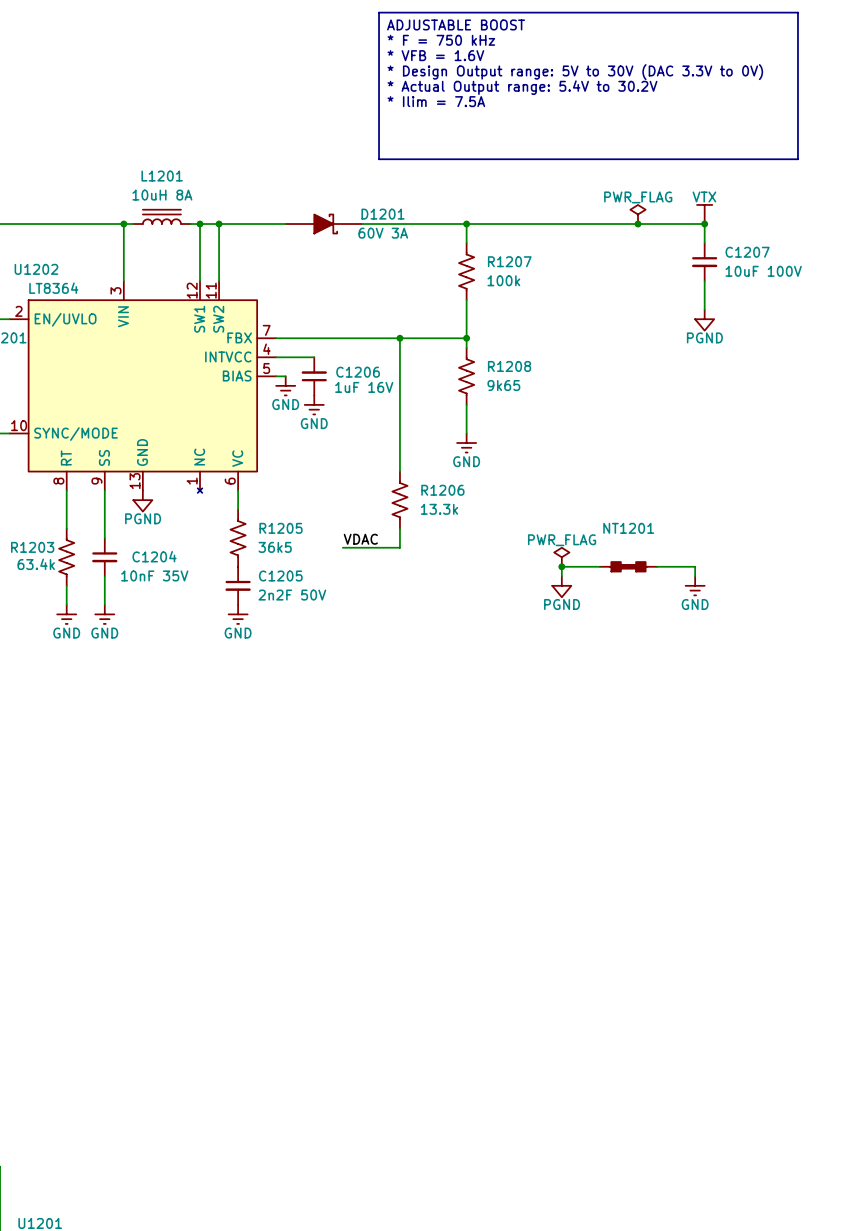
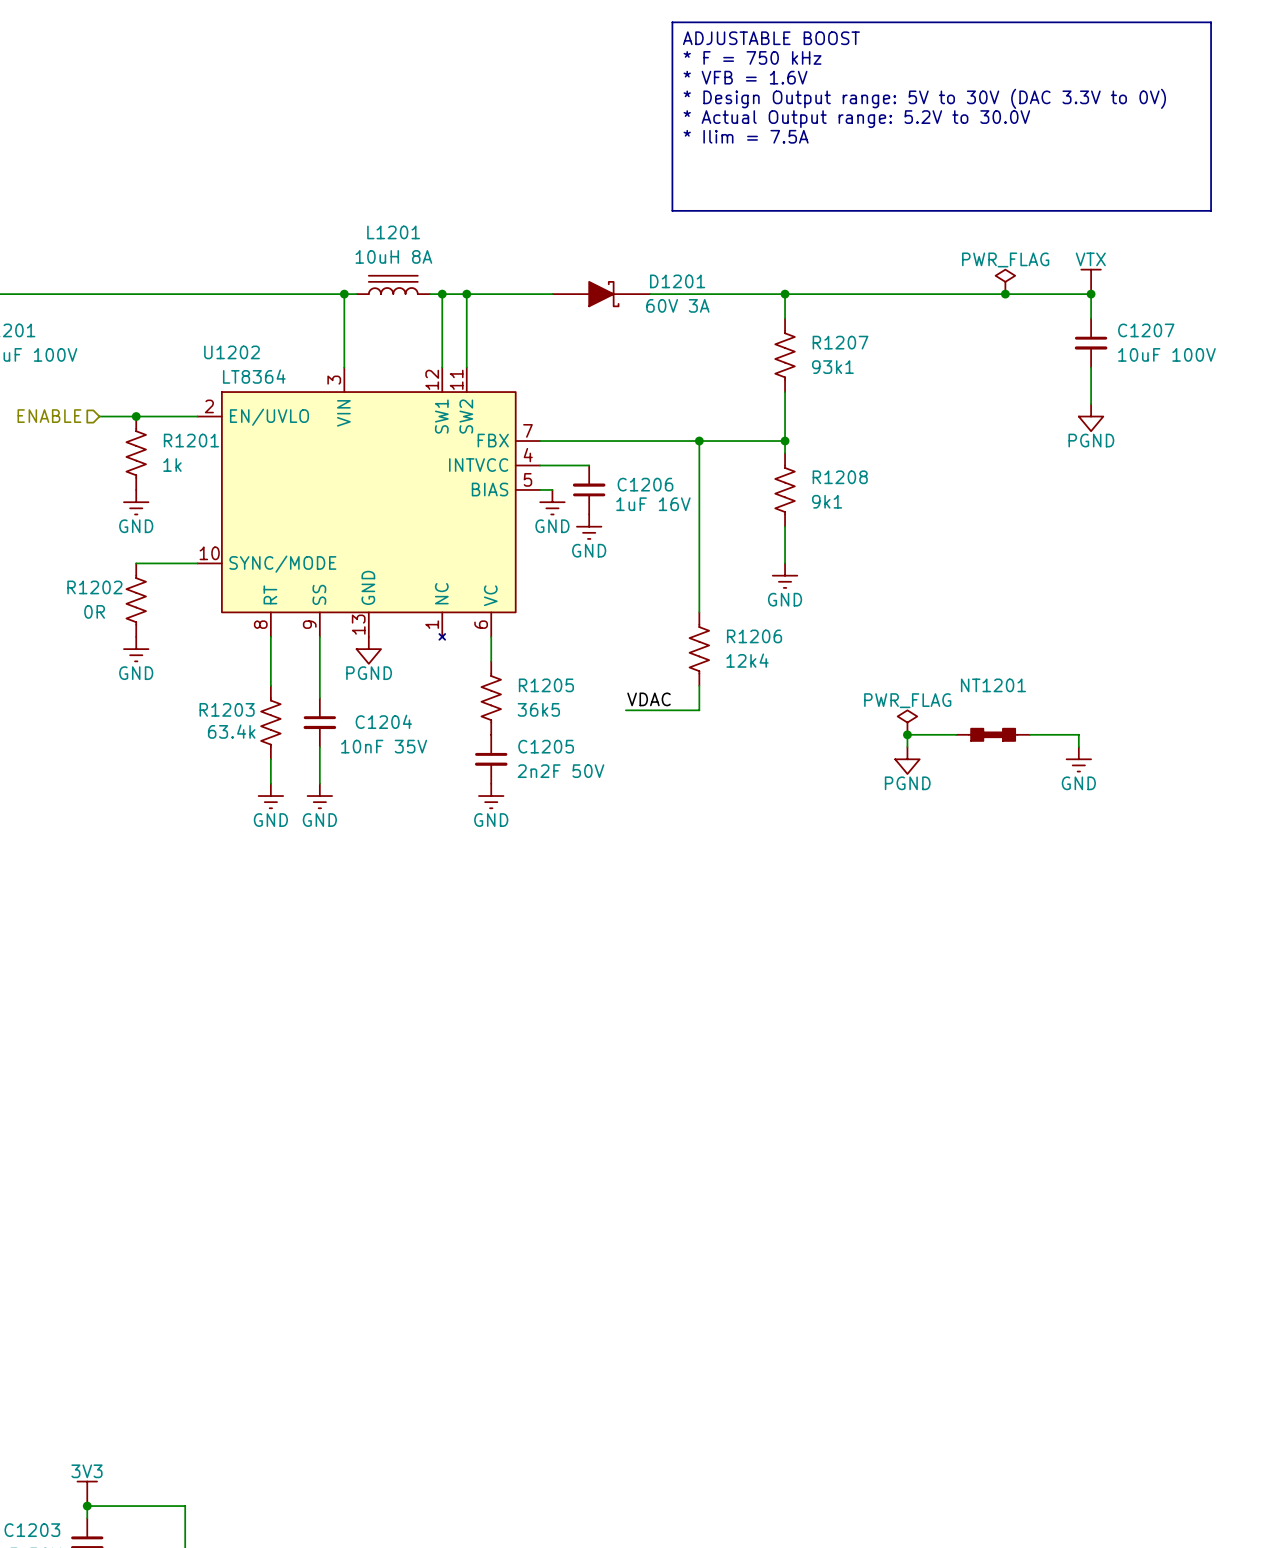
text: * Actual Output range: 5.4V to 30.2V (522, 87) -> * Actual Output range: 5.2V to 30.0V (856, 119)
R1207 value: 100k (503, 280) -> 93k1 (832, 367)
R1208 value: 9k65 (503, 385) -> 9k1 (827, 501)
R1206 value: 13.3k (439, 509) -> 12k4 (747, 660)

